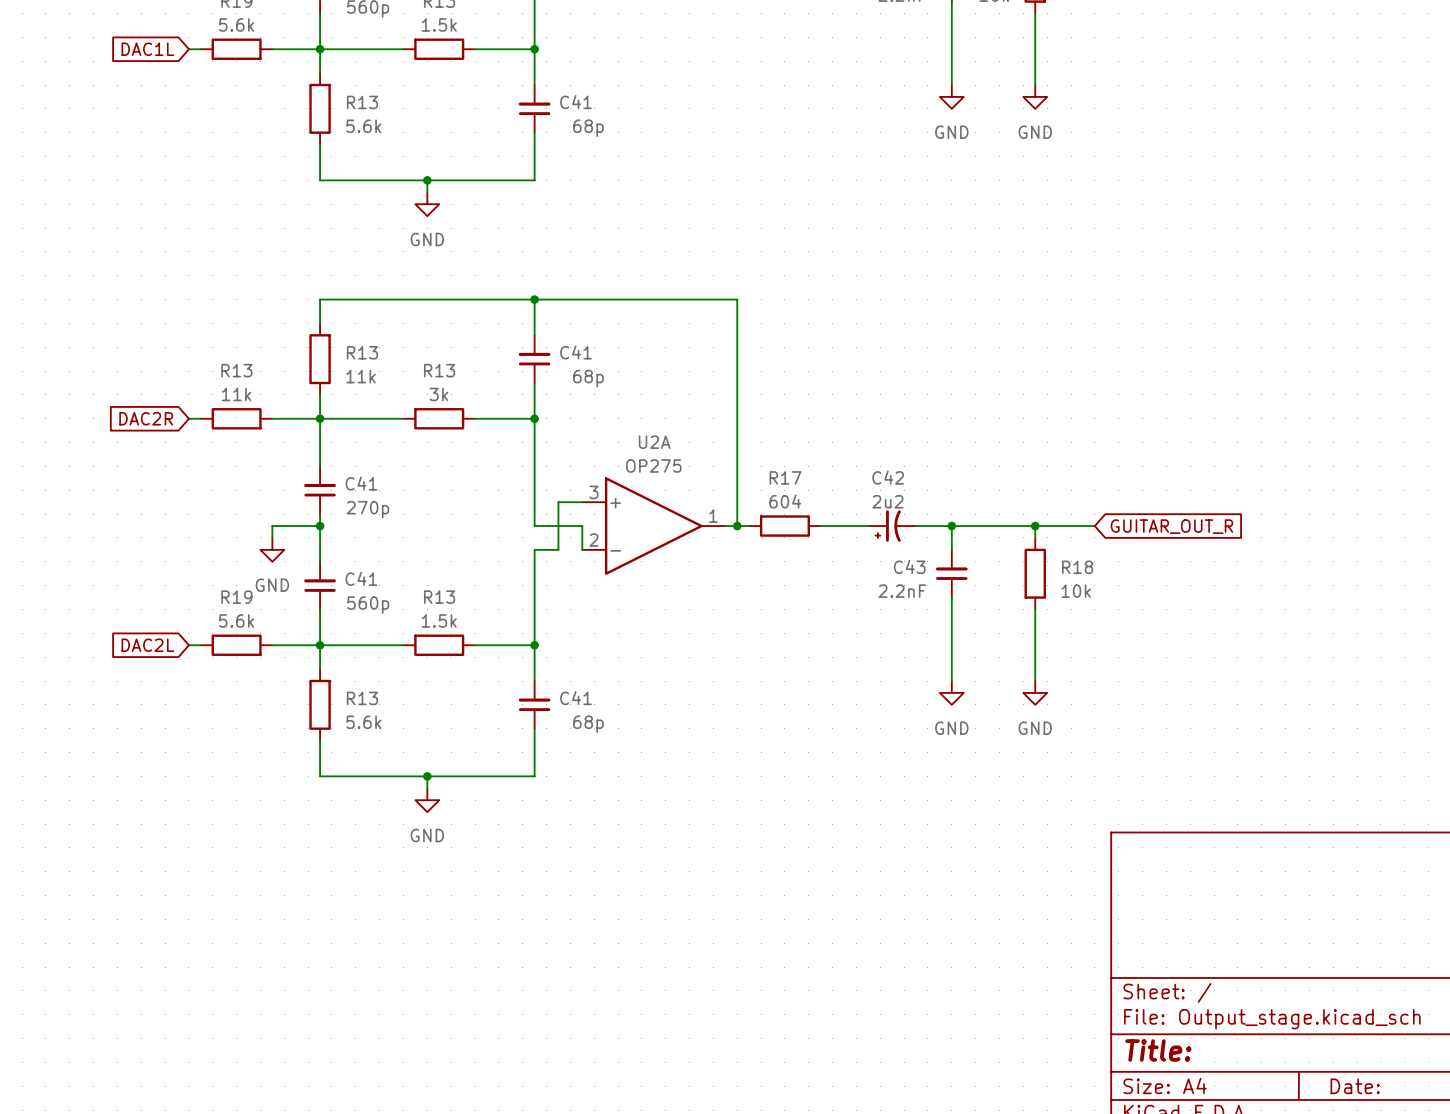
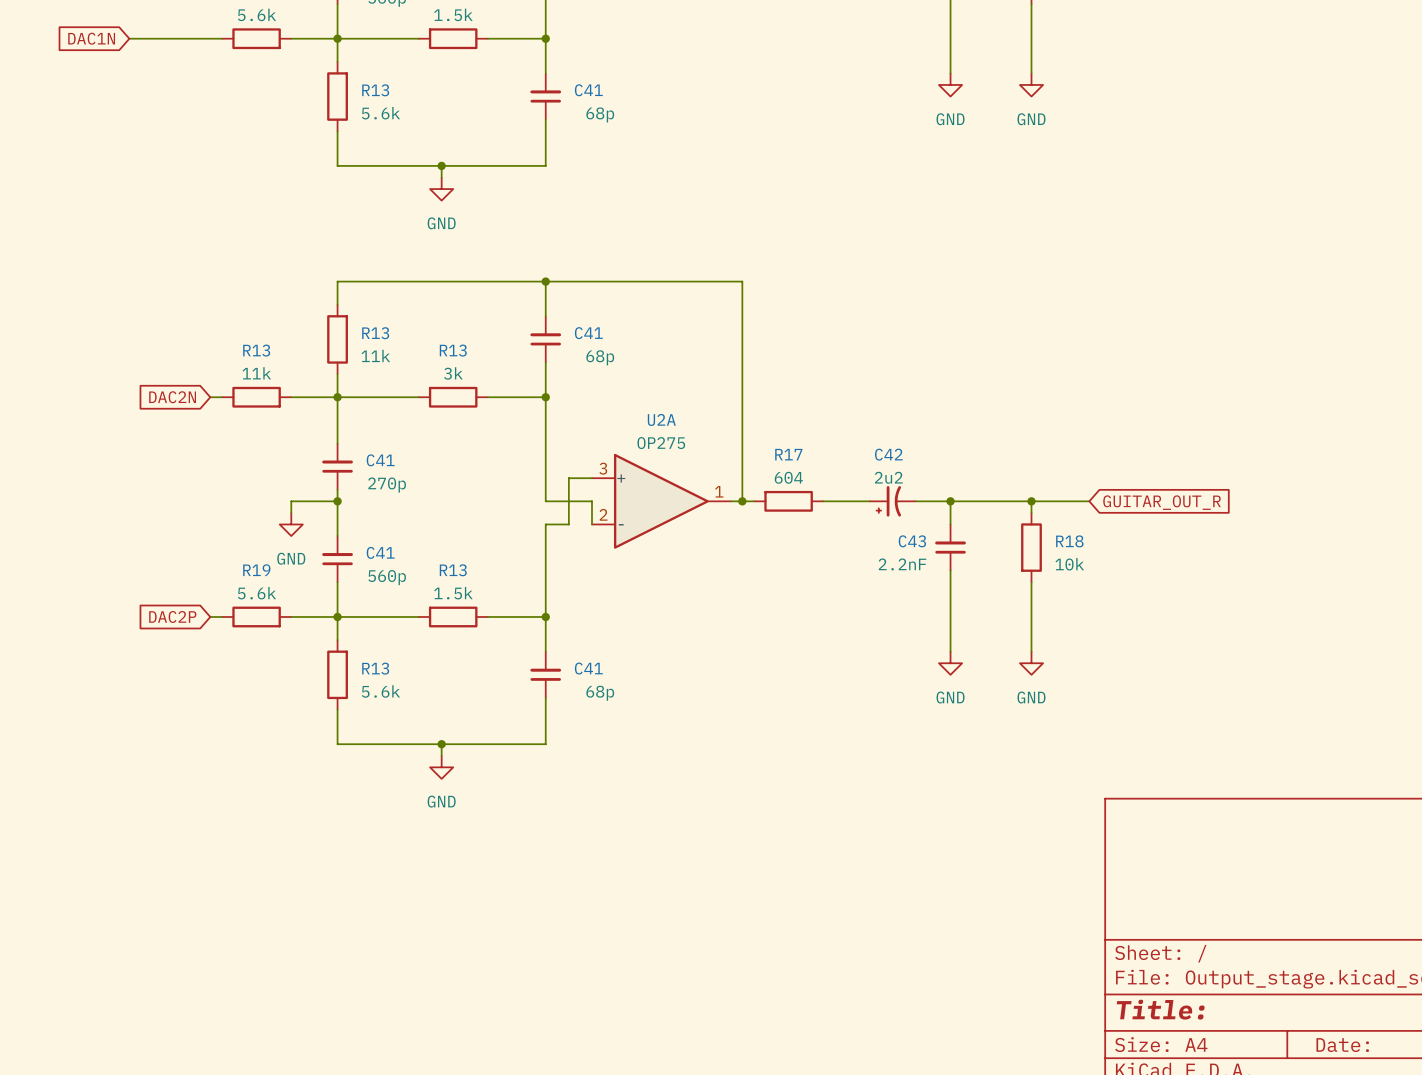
wire: none -> (129, 38) (210, 38)
global label: DAC1L (147, 49) -> DAC1N (91, 38)
global label: DAC2R (146, 418) -> DAC2N (172, 397)
global label: DAC2L (147, 645) -> DAC2P (172, 616)

